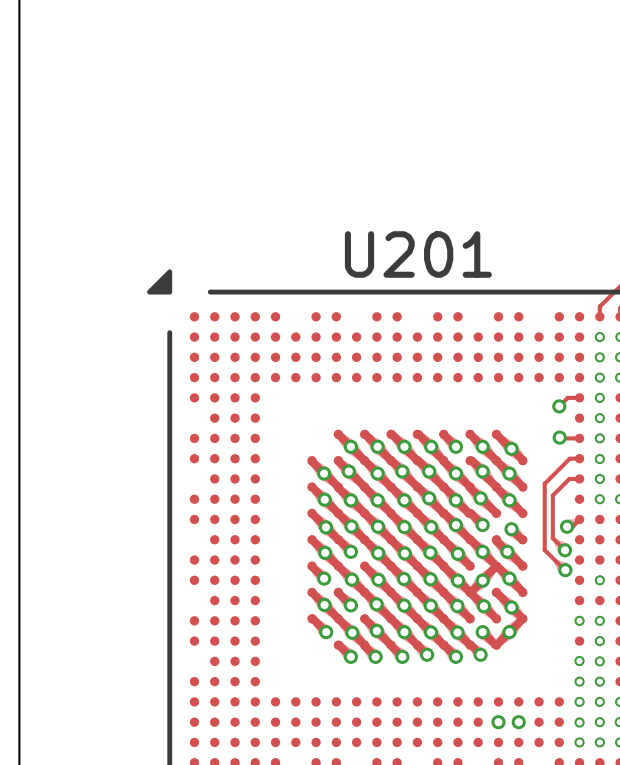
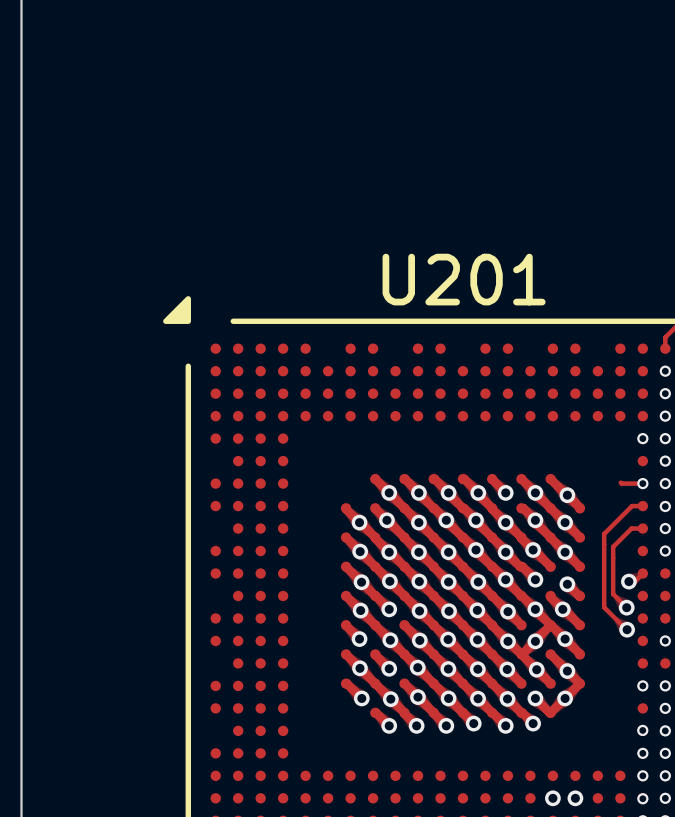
track: (579, 397) (567, 397) (559, 406) -> none
via: none -> (642, 438)
via: (559, 406) -> none
via: (559, 437) -> none
via: none -> (642, 483)

